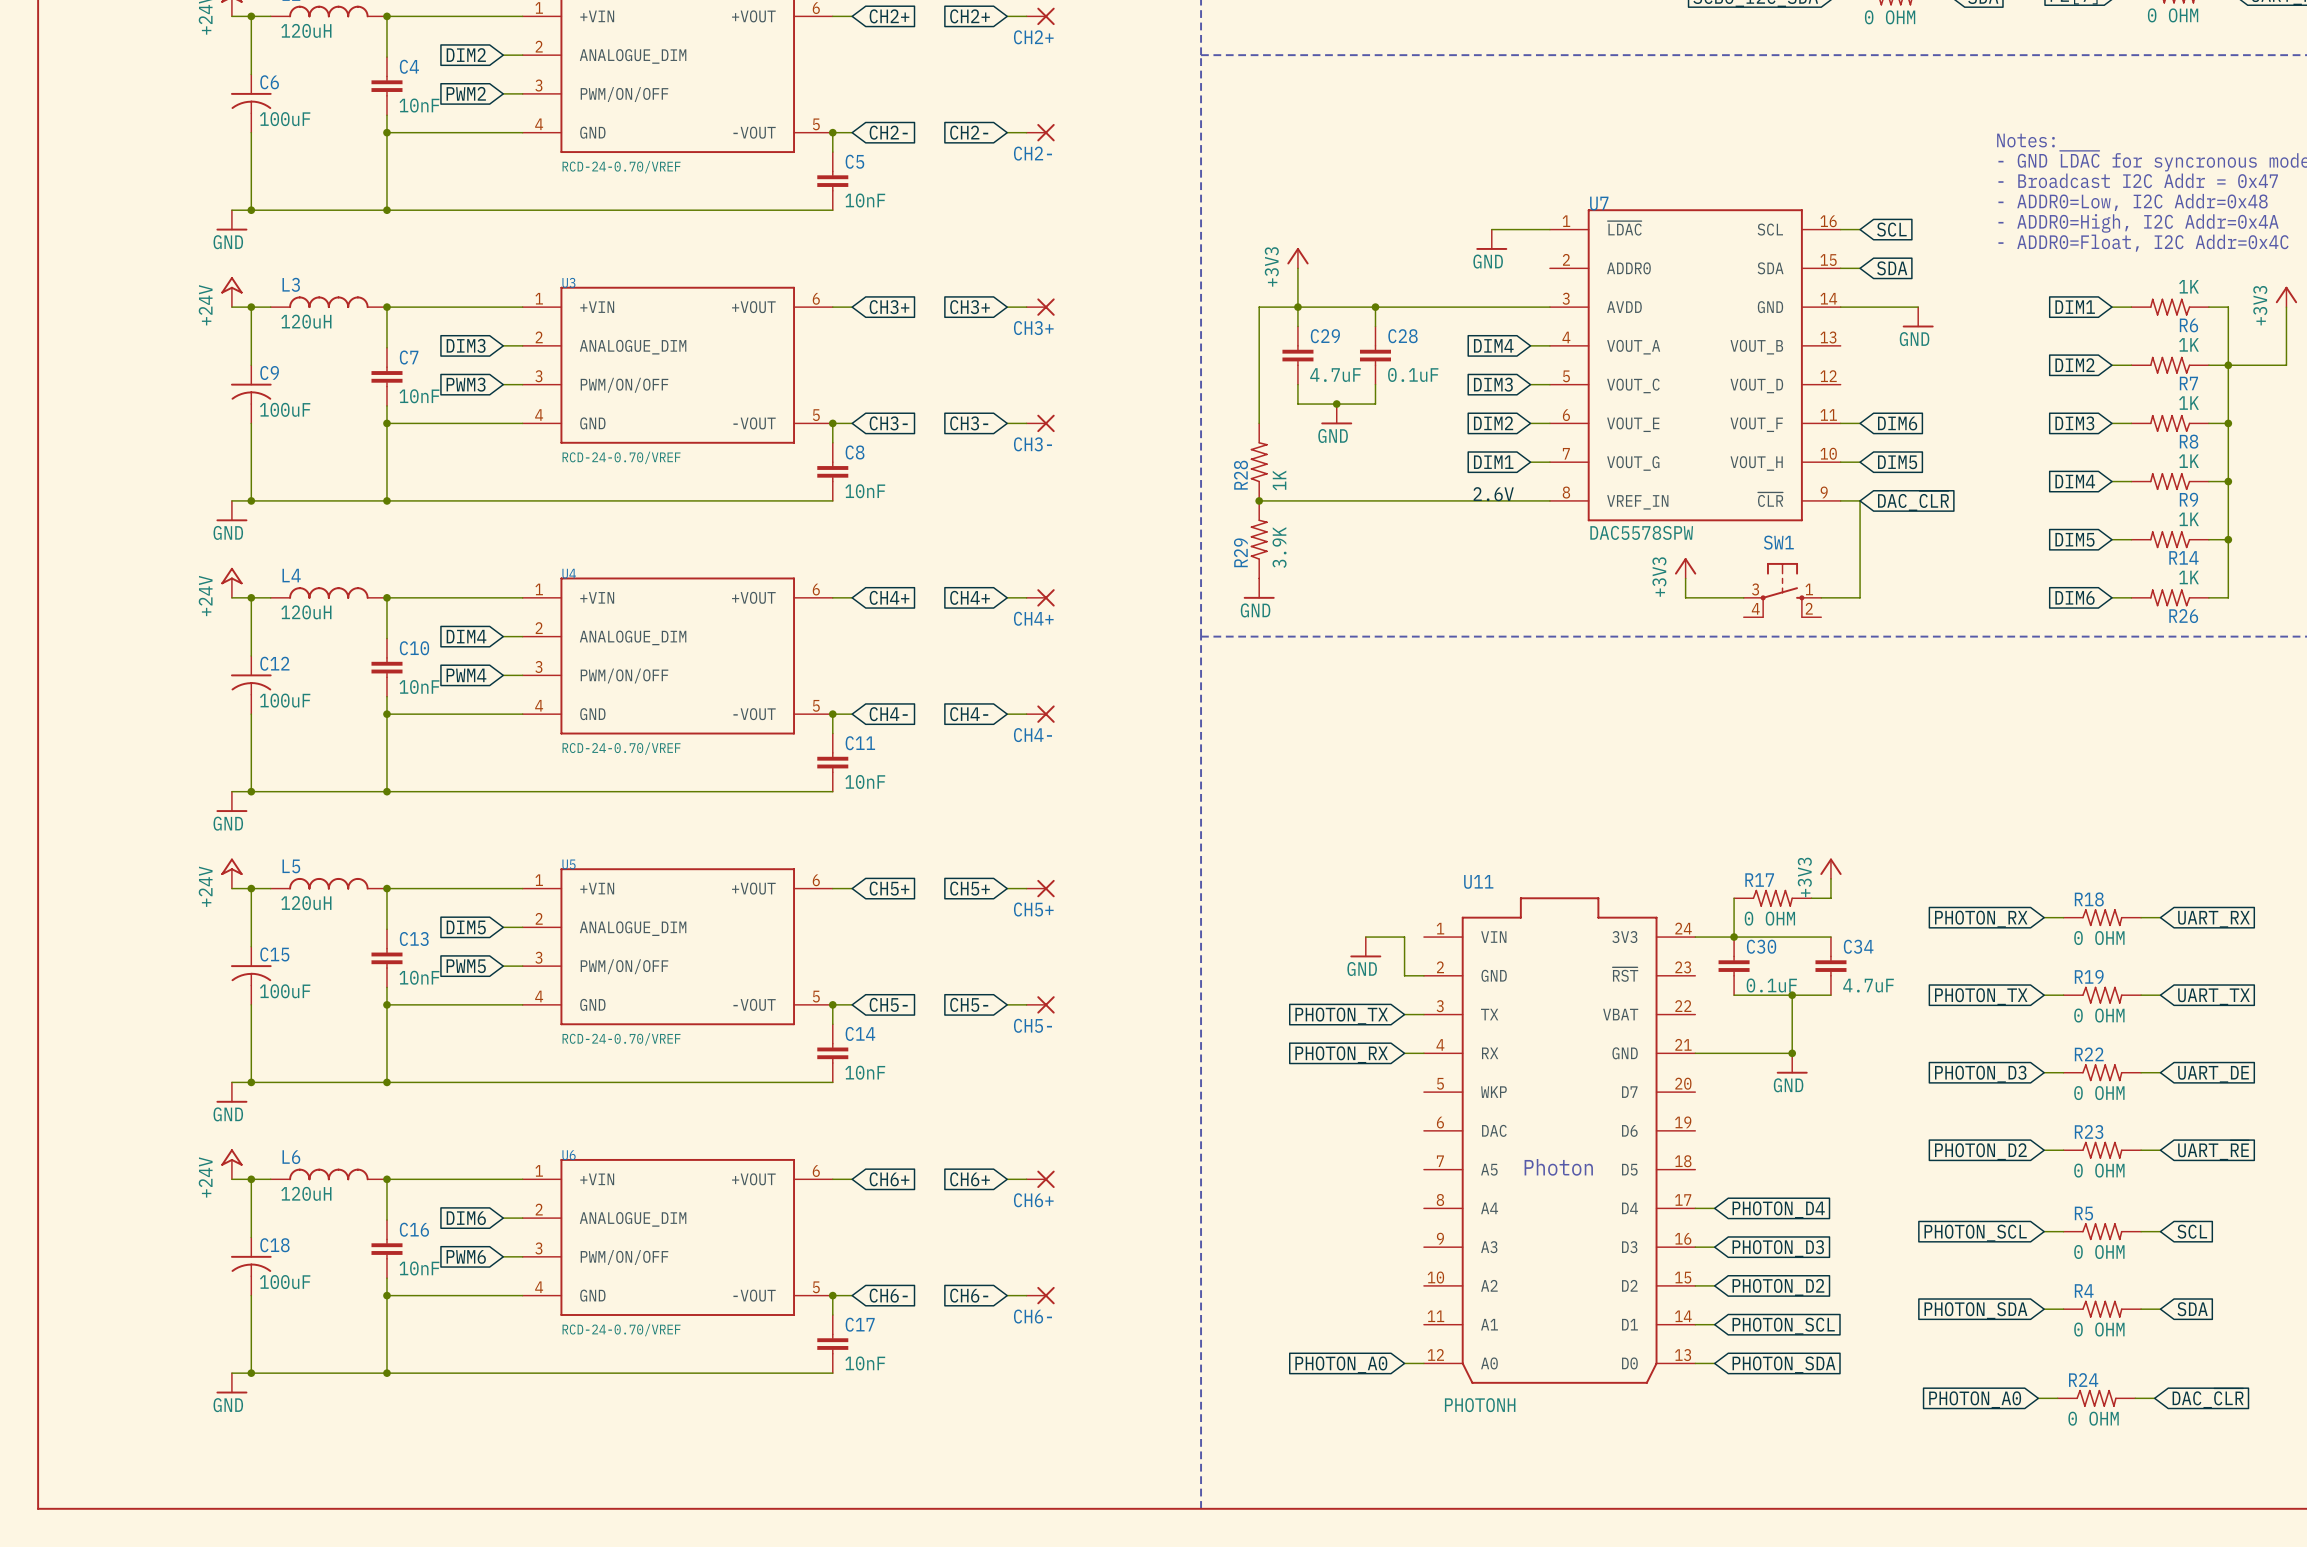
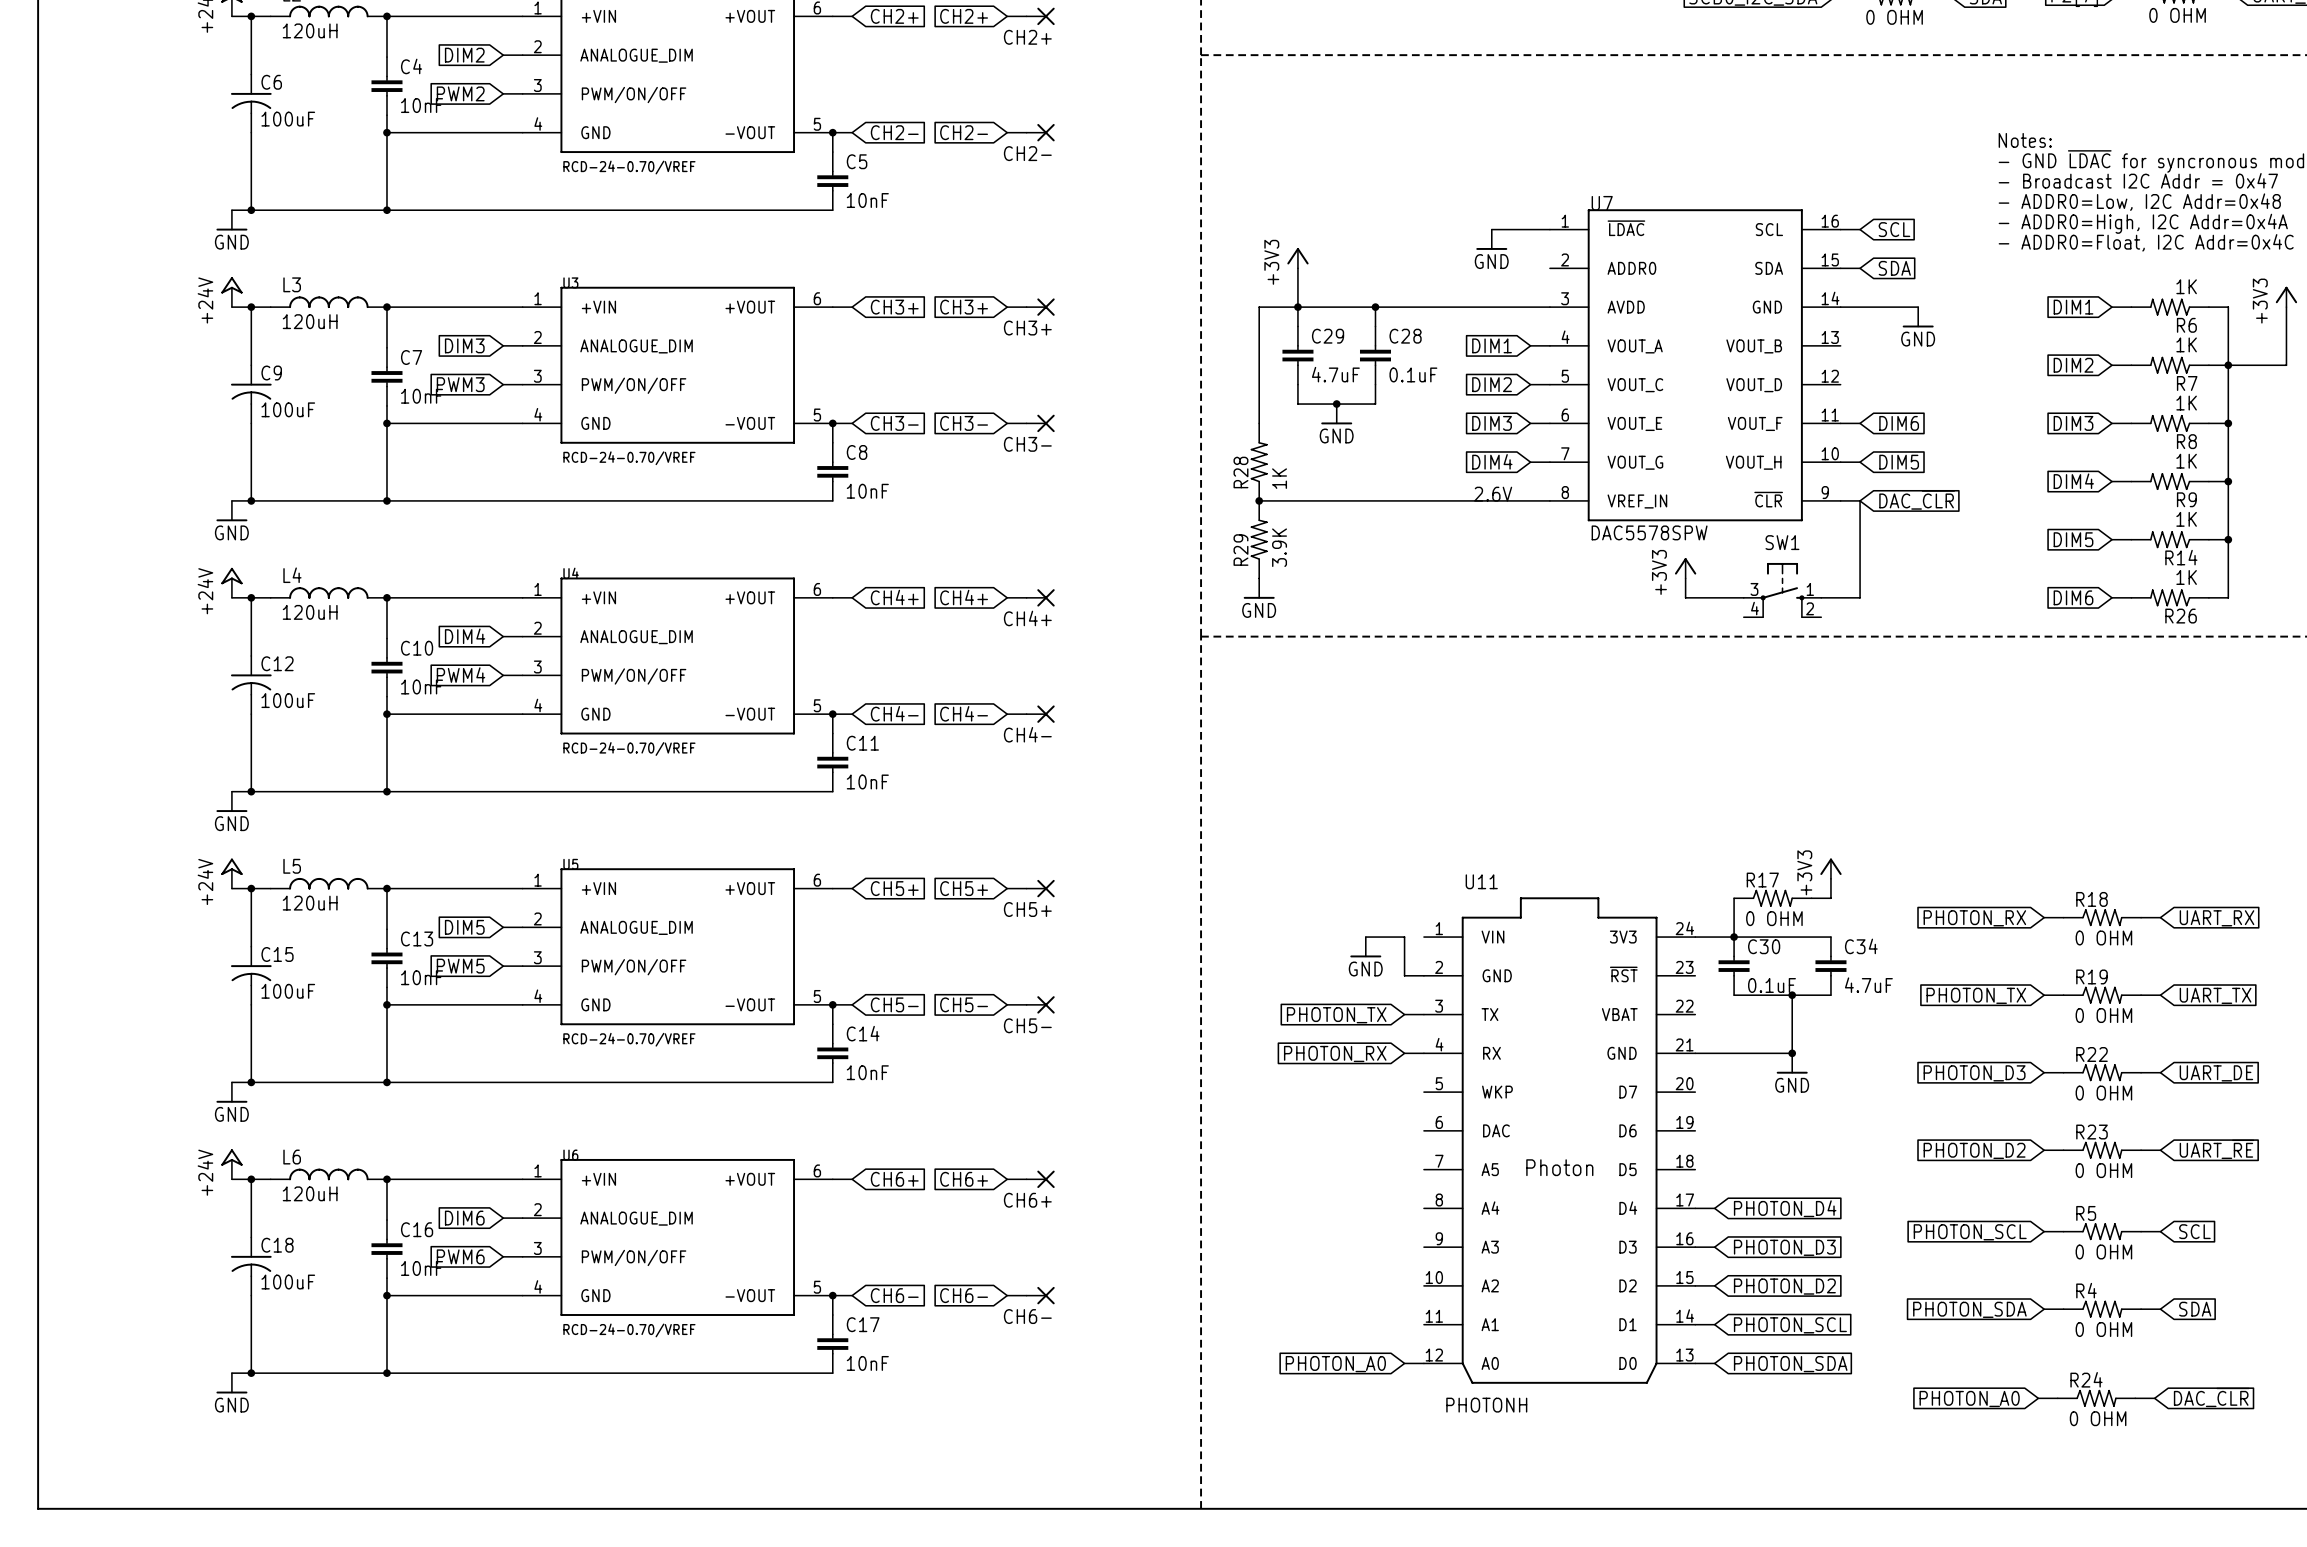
global label: DIM4 (1493, 345) -> DIM1 (1492, 345)
global label: DIM3 (1493, 384) -> DIM2 (1492, 384)
global label: DIM2 (1493, 423) -> DIM3 (1492, 423)
global label: DIM1 (1493, 462) -> DIM4 (1492, 461)

